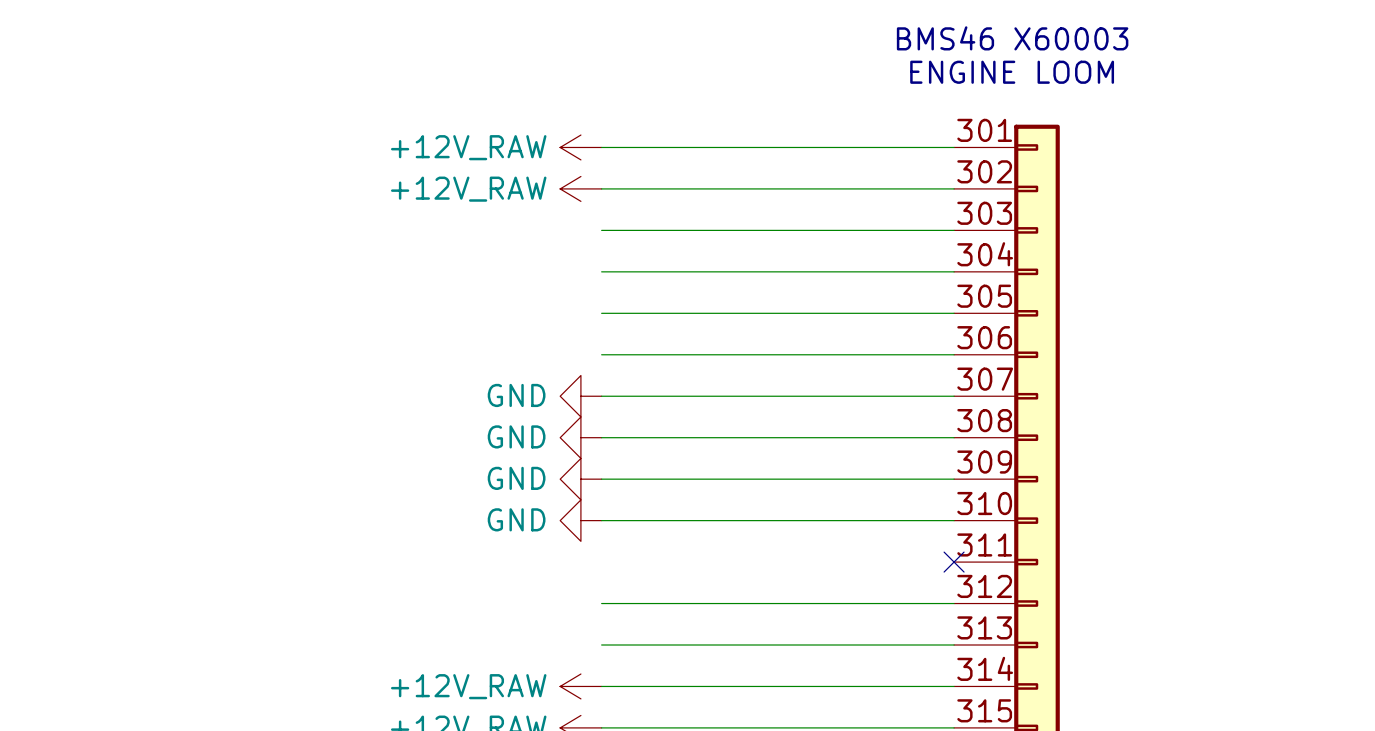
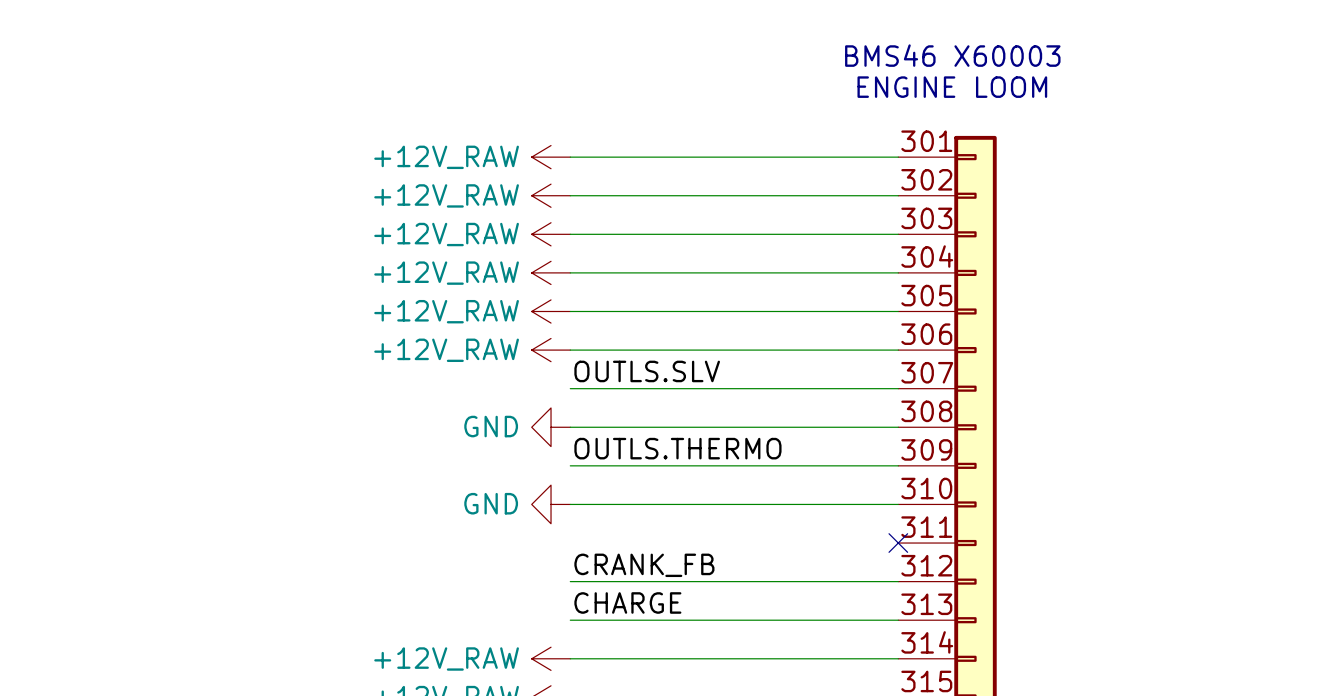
power symbol: none -> +12V_RAW (551, 234)
power symbol: none -> +12V_RAW (551, 272)
power symbol: none -> +12V_RAW (551, 311)
power symbol: none -> +12V_RAW (551, 350)
label: none -> OUTLS.SLV (647, 371)
power symbol: GND (580, 396) -> none
label: none -> OUTLS.THERMO (677, 448)
power symbol: GND (580, 479) -> none
label: none -> CRANK_FB (644, 565)
label: none -> CHARGE (627, 602)

